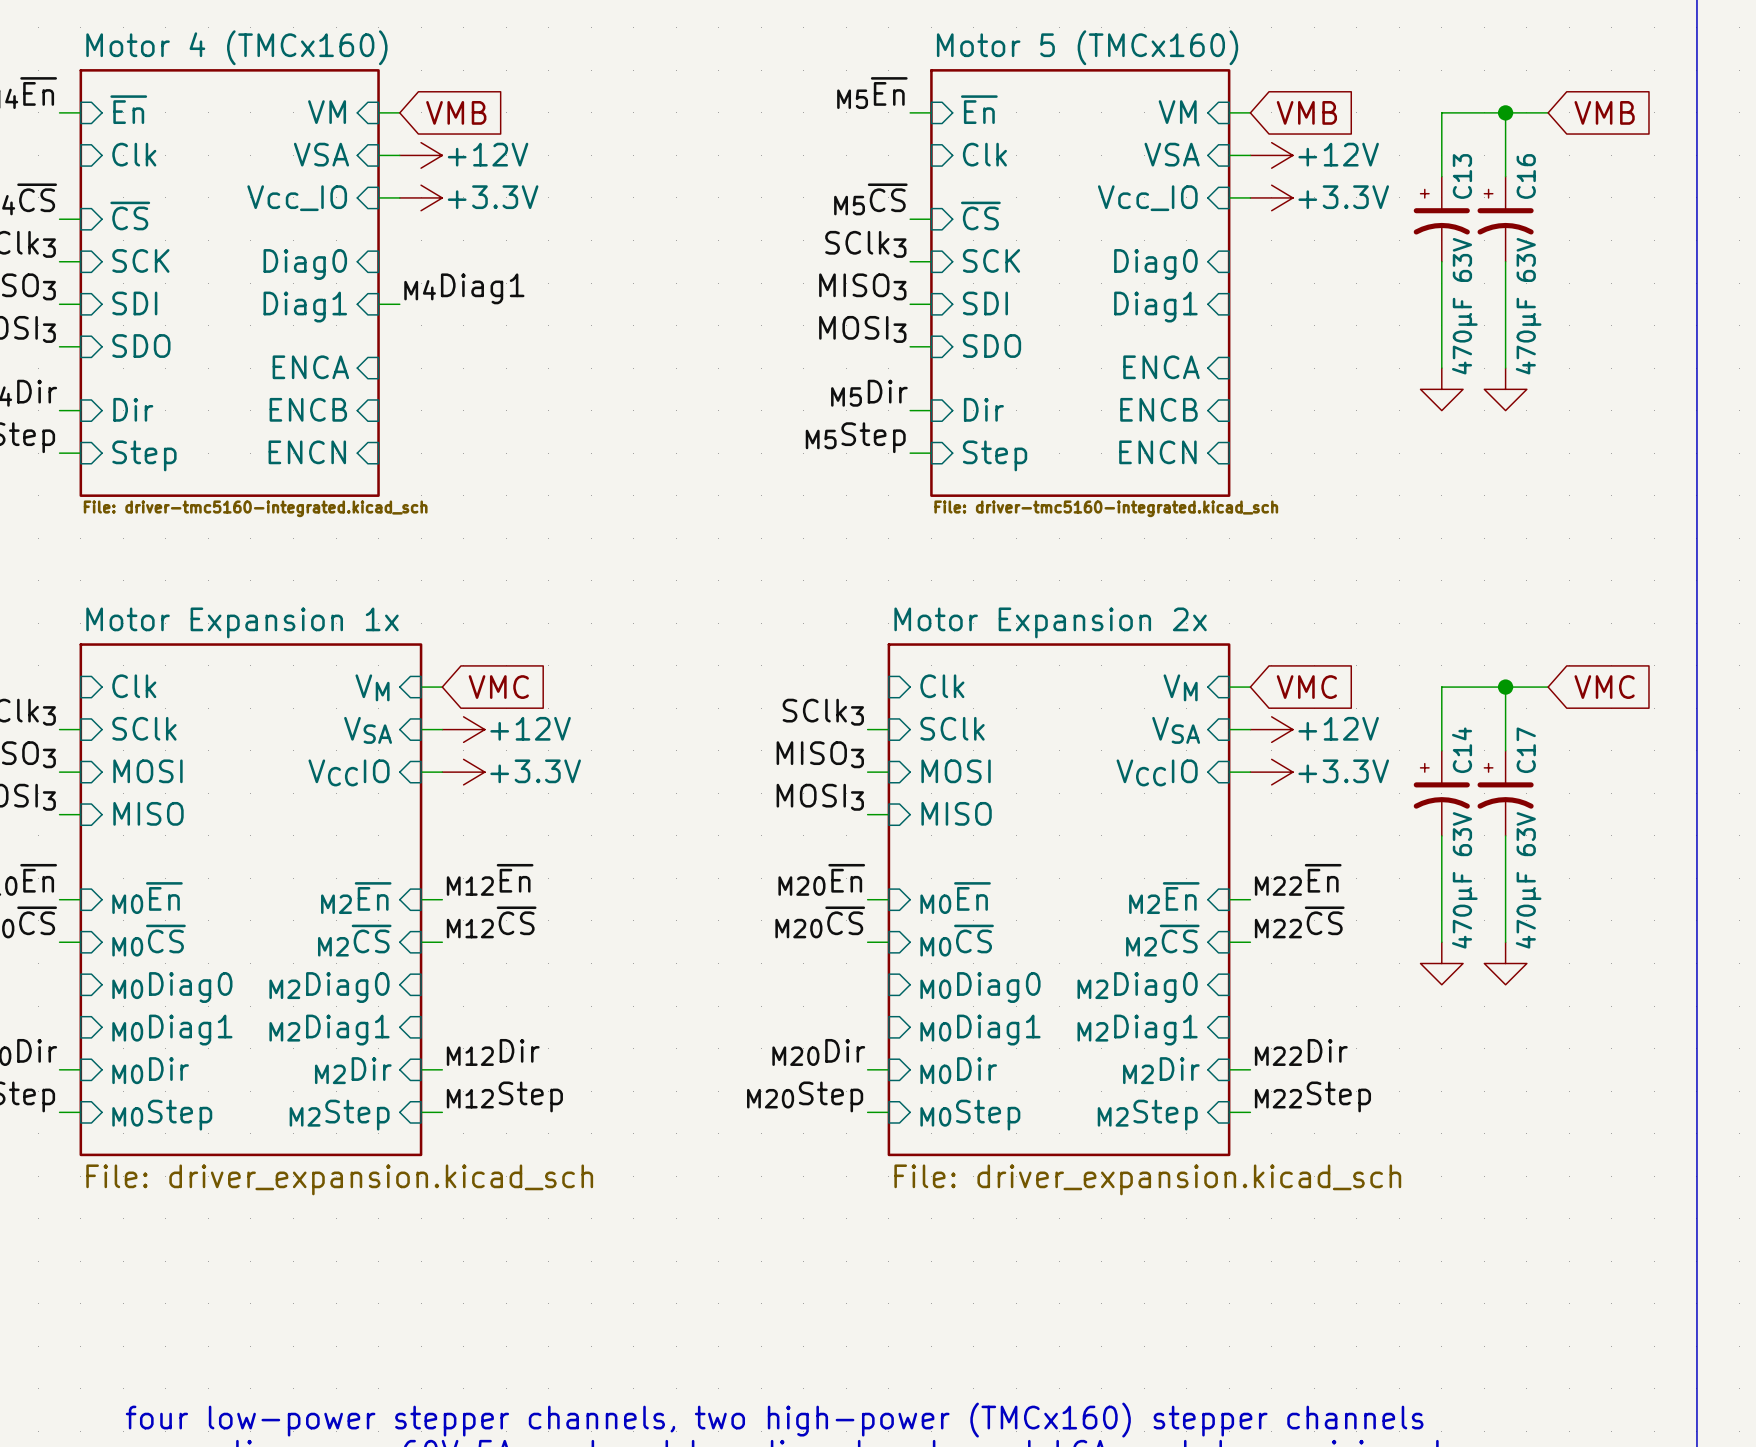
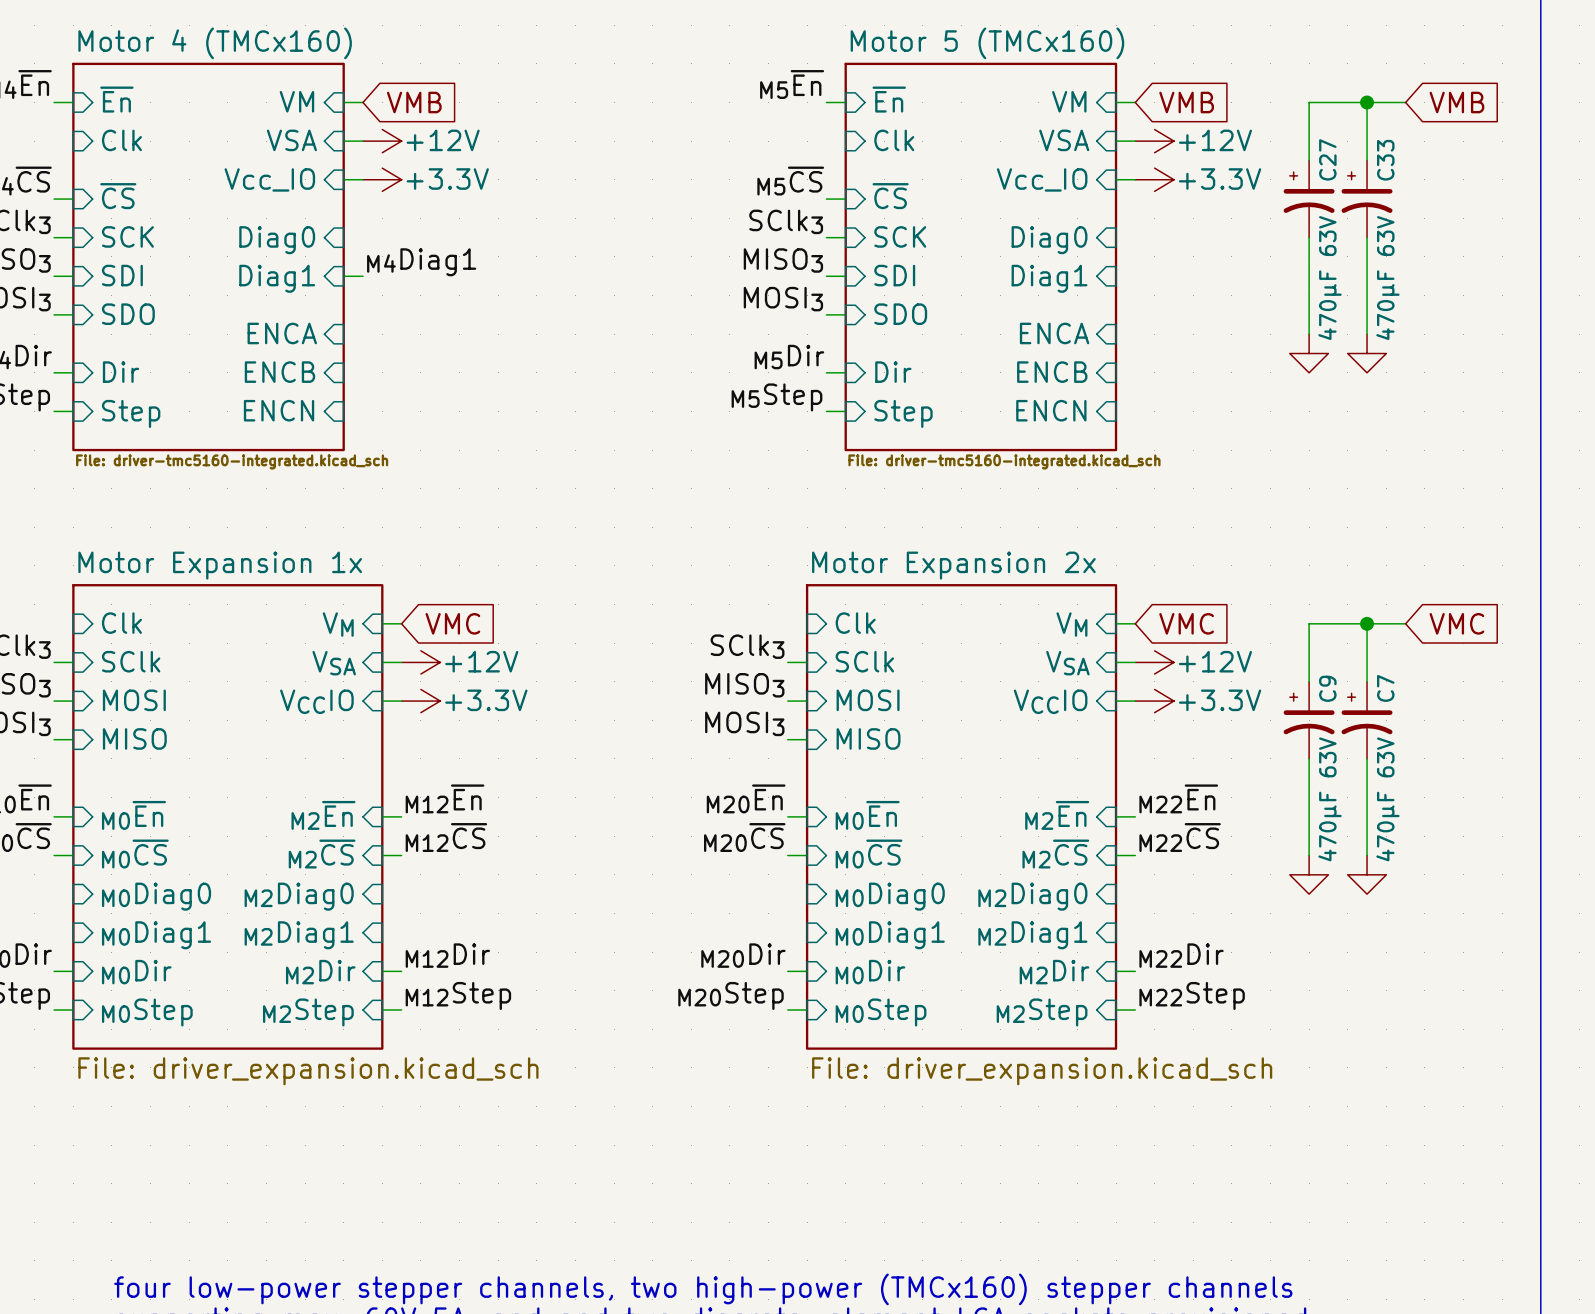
C13 name: C13 (1462, 176) -> C27 (1327, 159)
C16 name: C16 (1526, 176) -> C33 (1385, 160)
C14 name: C14 (1462, 750) -> C9 (1327, 688)
C17 name: C17 (1526, 750) -> C7 (1385, 688)

